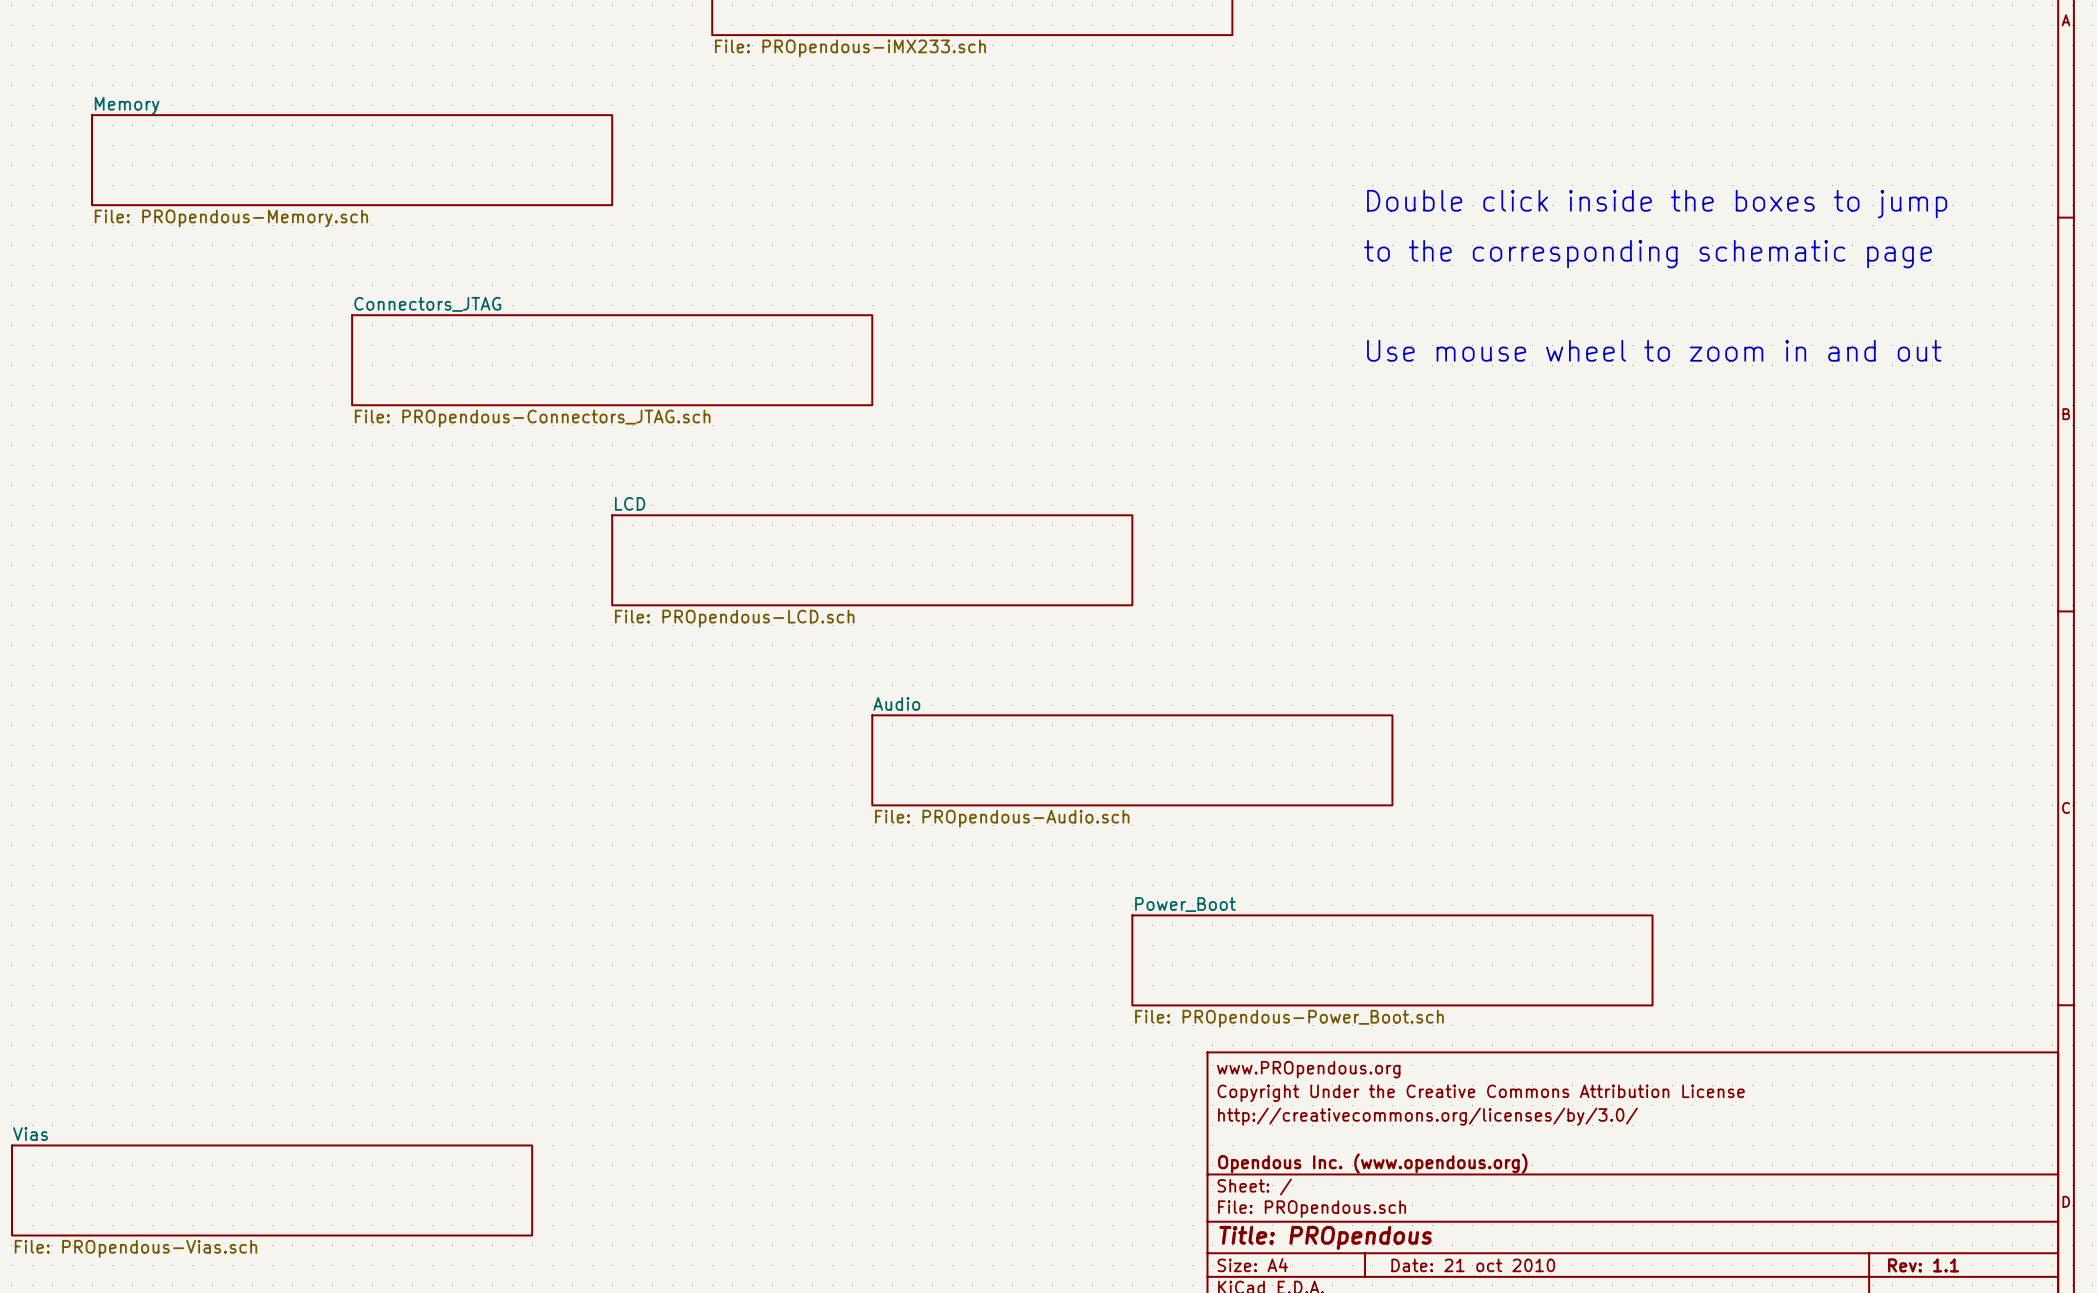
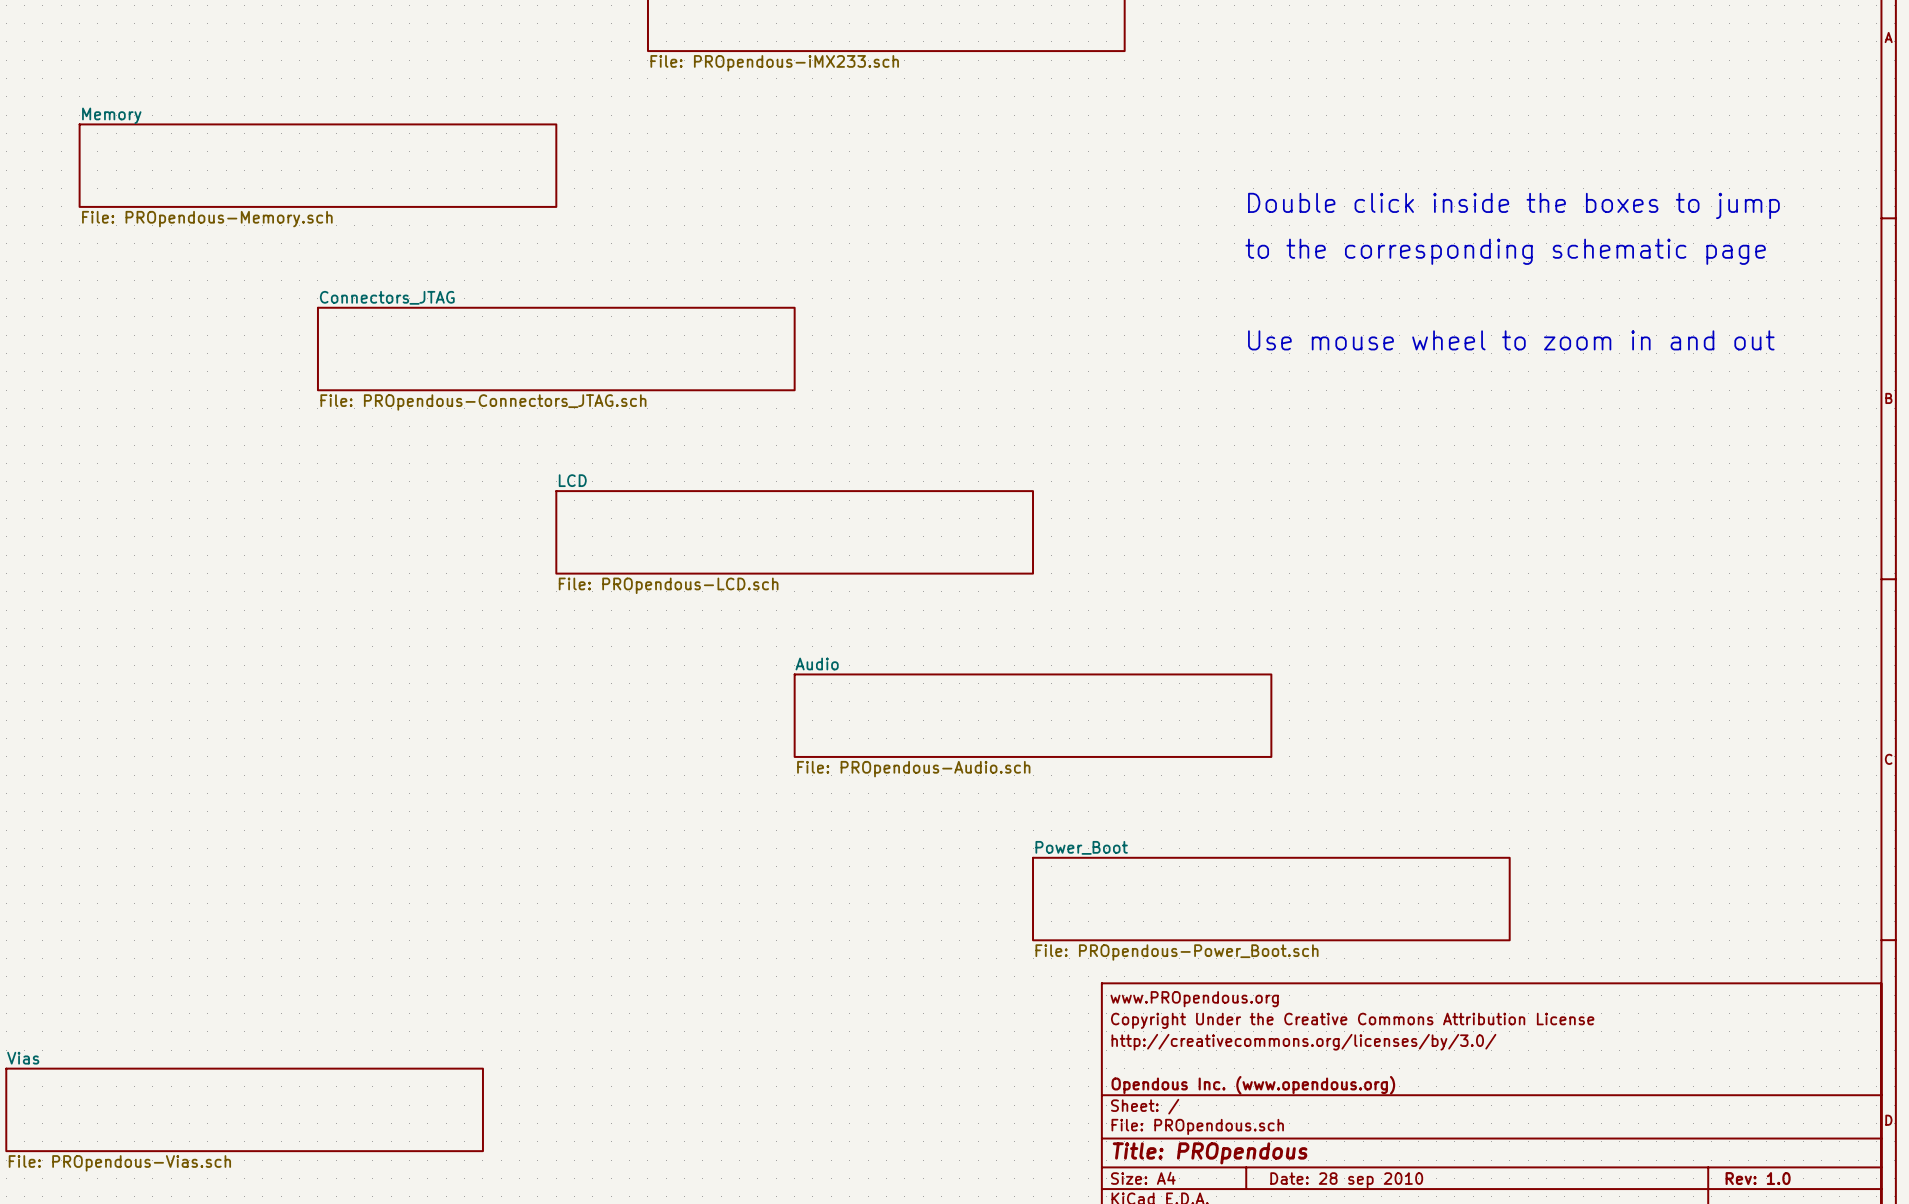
title block: Date: 21 oct 2010 (1473, 1265) -> Date: 28 sep 2010 (1346, 1180)
title block: Rev: 1.1 (1923, 1265) -> Rev: 1.0 (1758, 1178)

